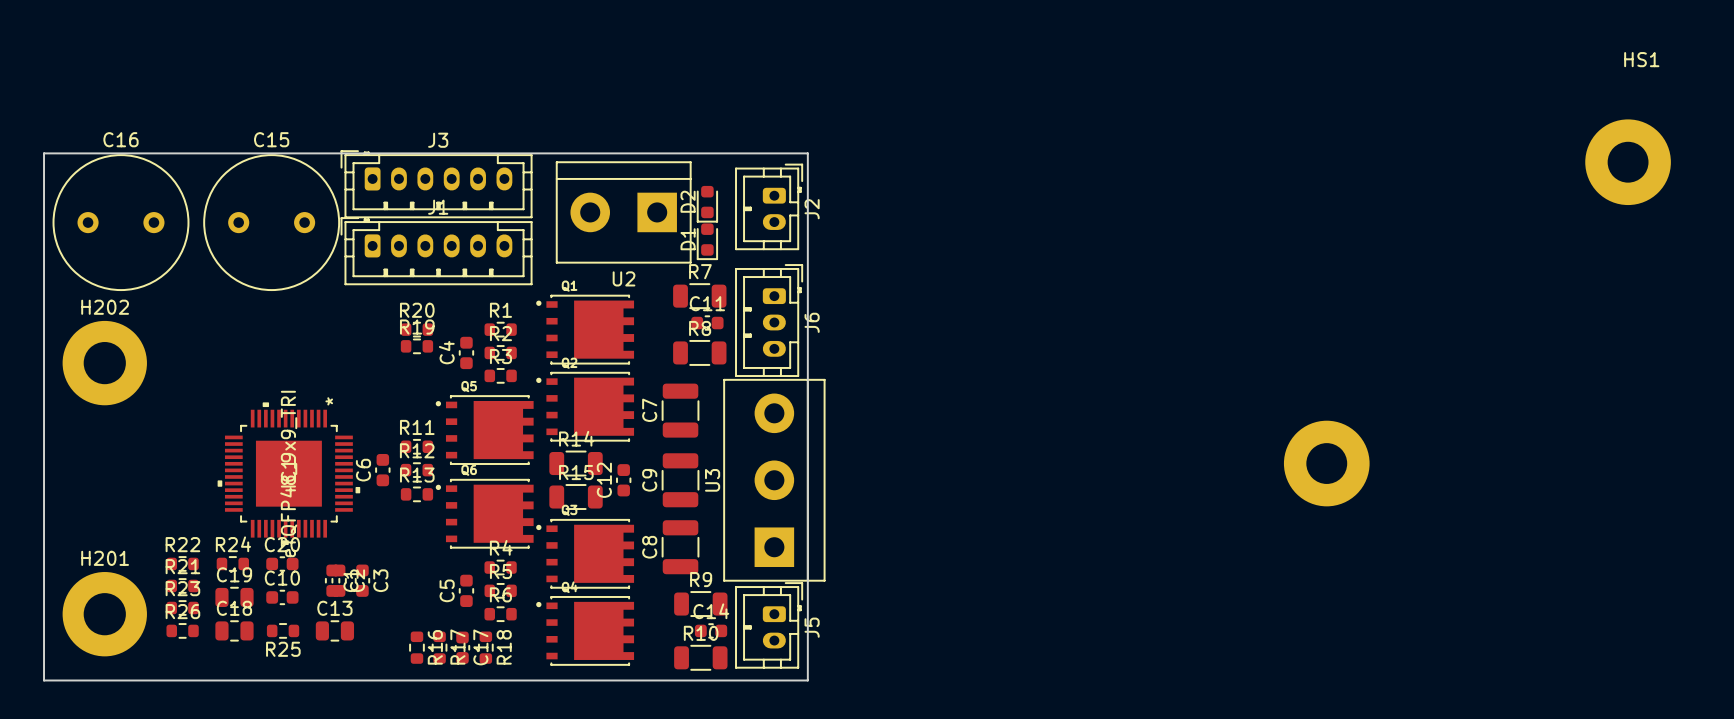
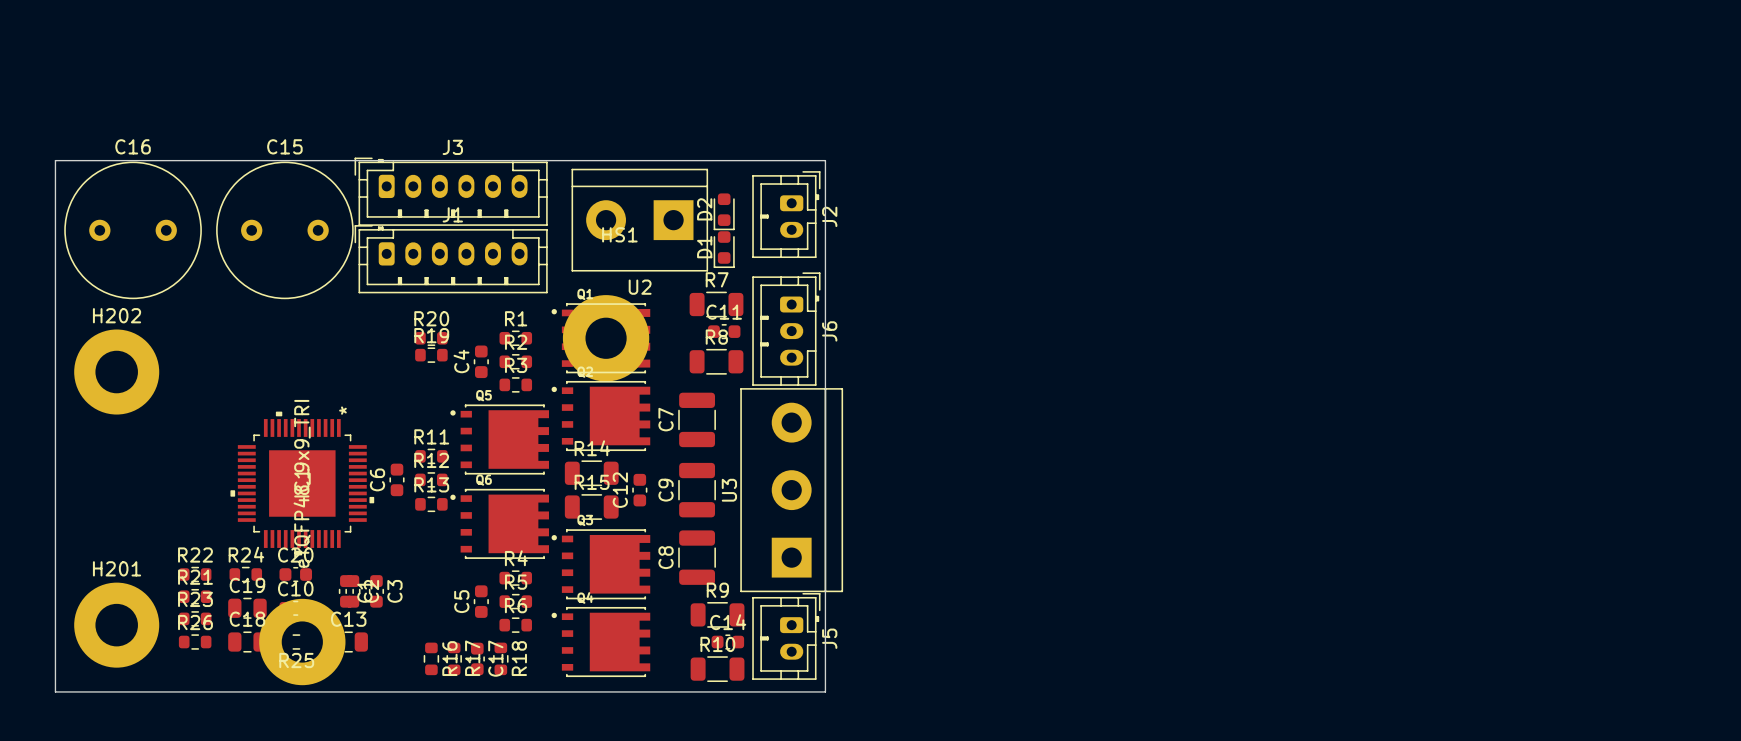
HS1 position: (1477, 312) -> (454, 490)

